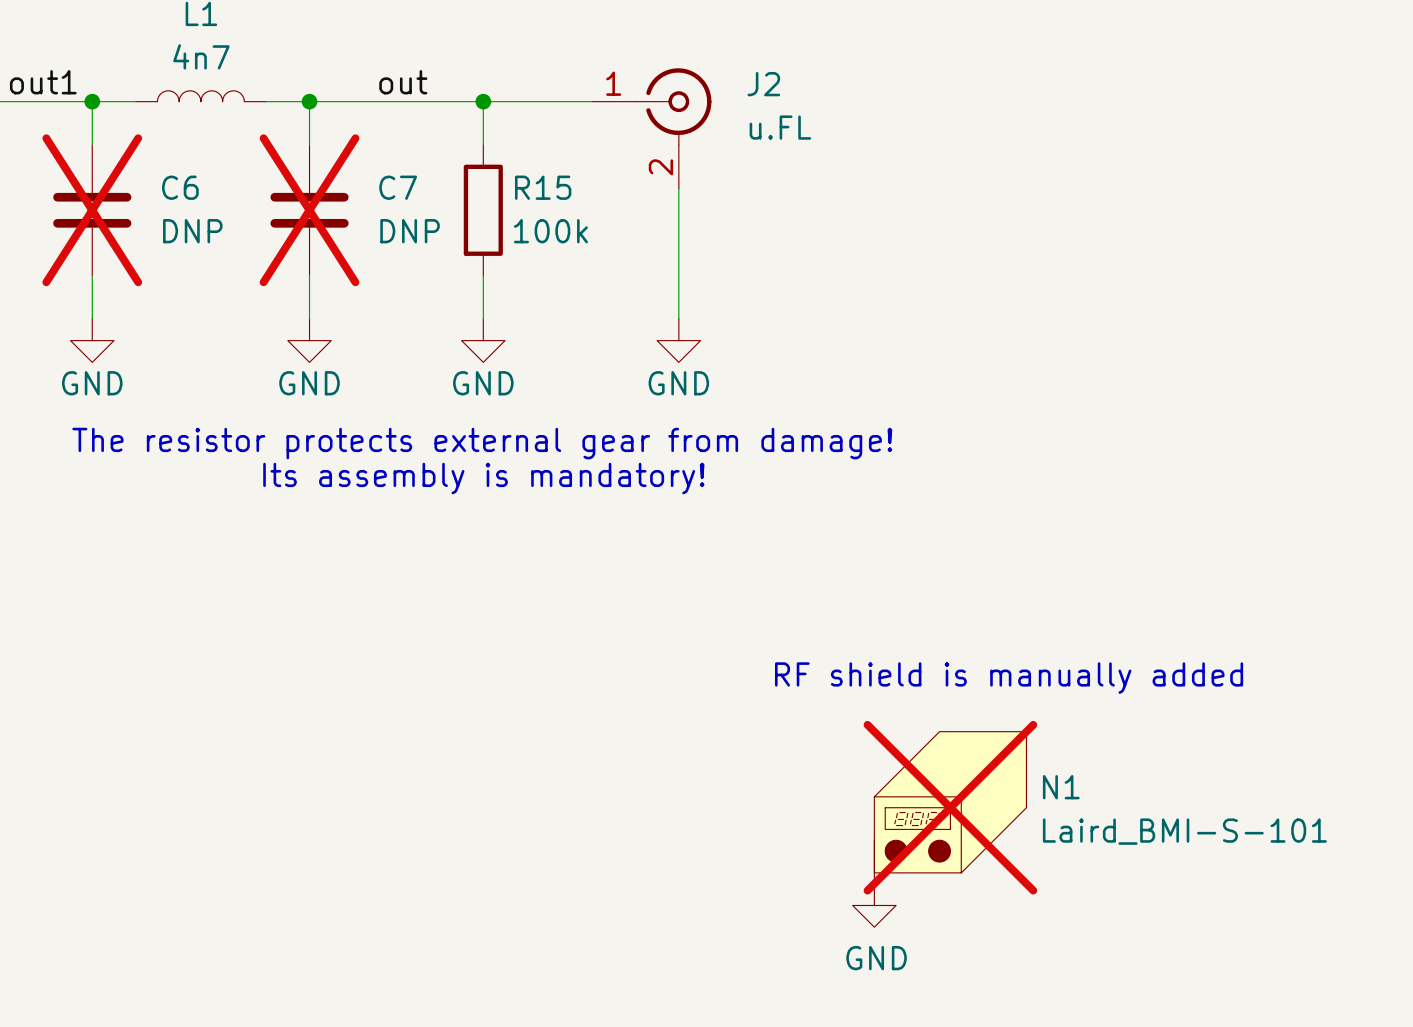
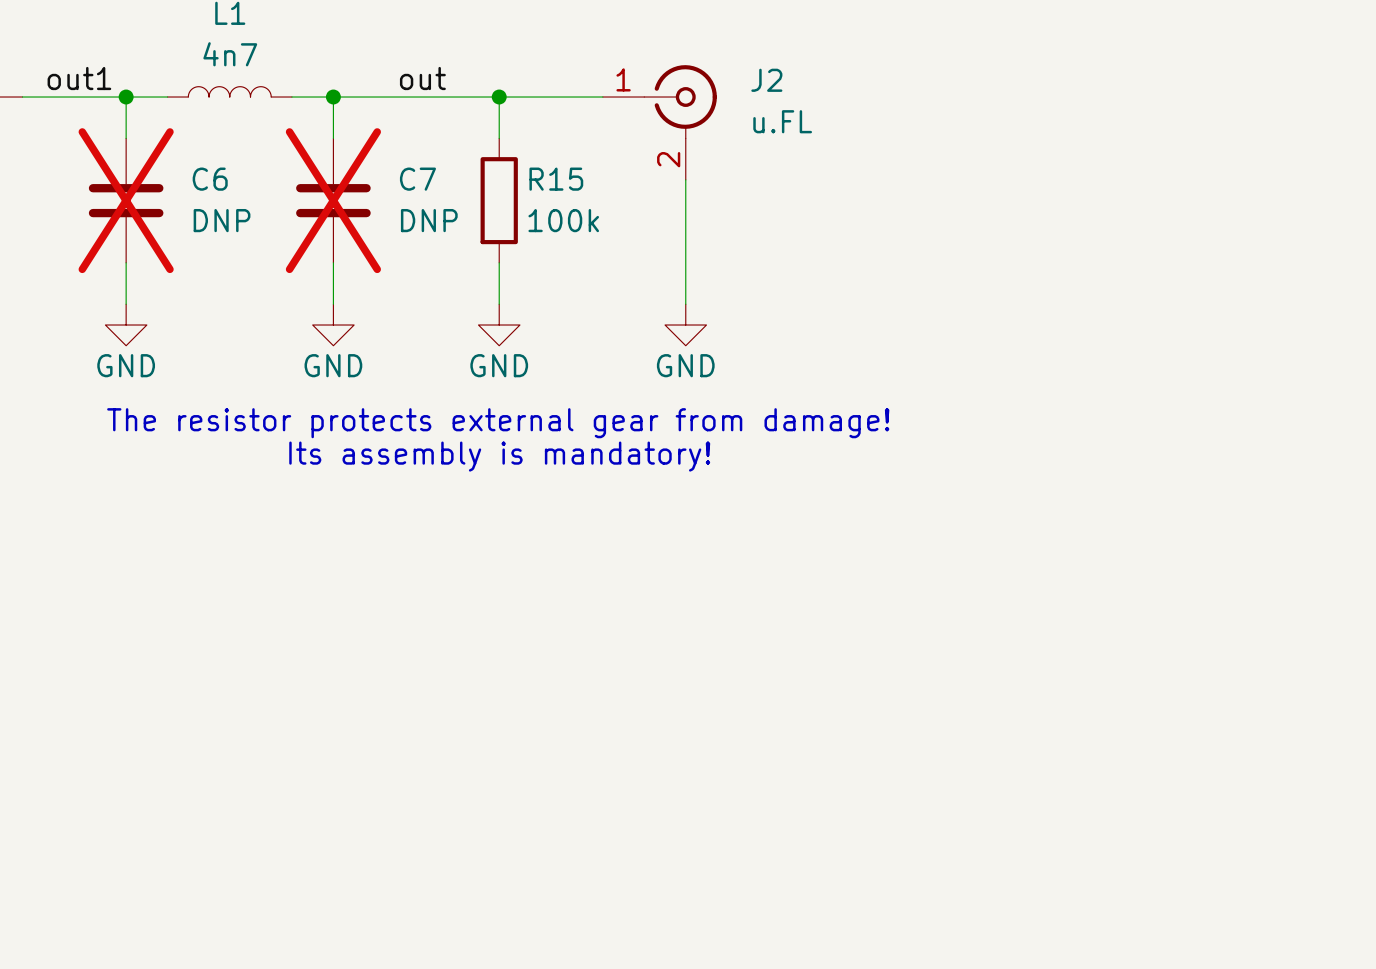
text: RF shield is manually added (1009, 678) -> none
N1: Laird_BMI-S-101 (950, 807) -> none
power symbol: GND (874, 905) -> none

